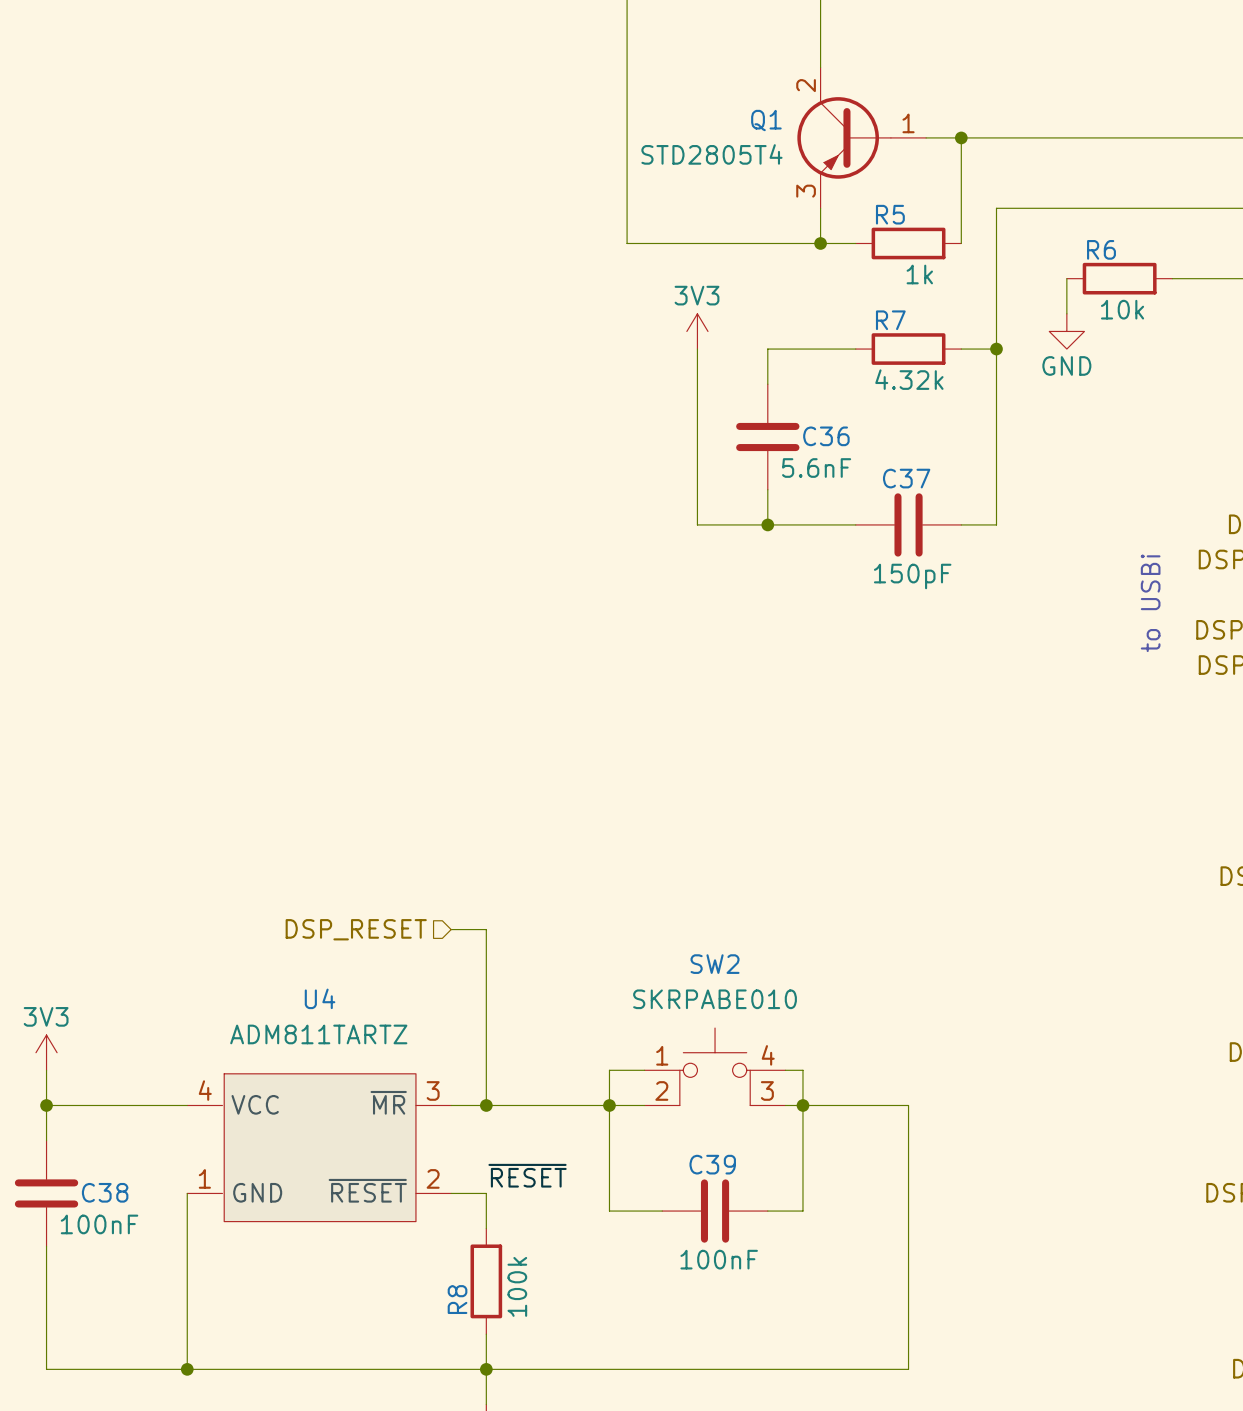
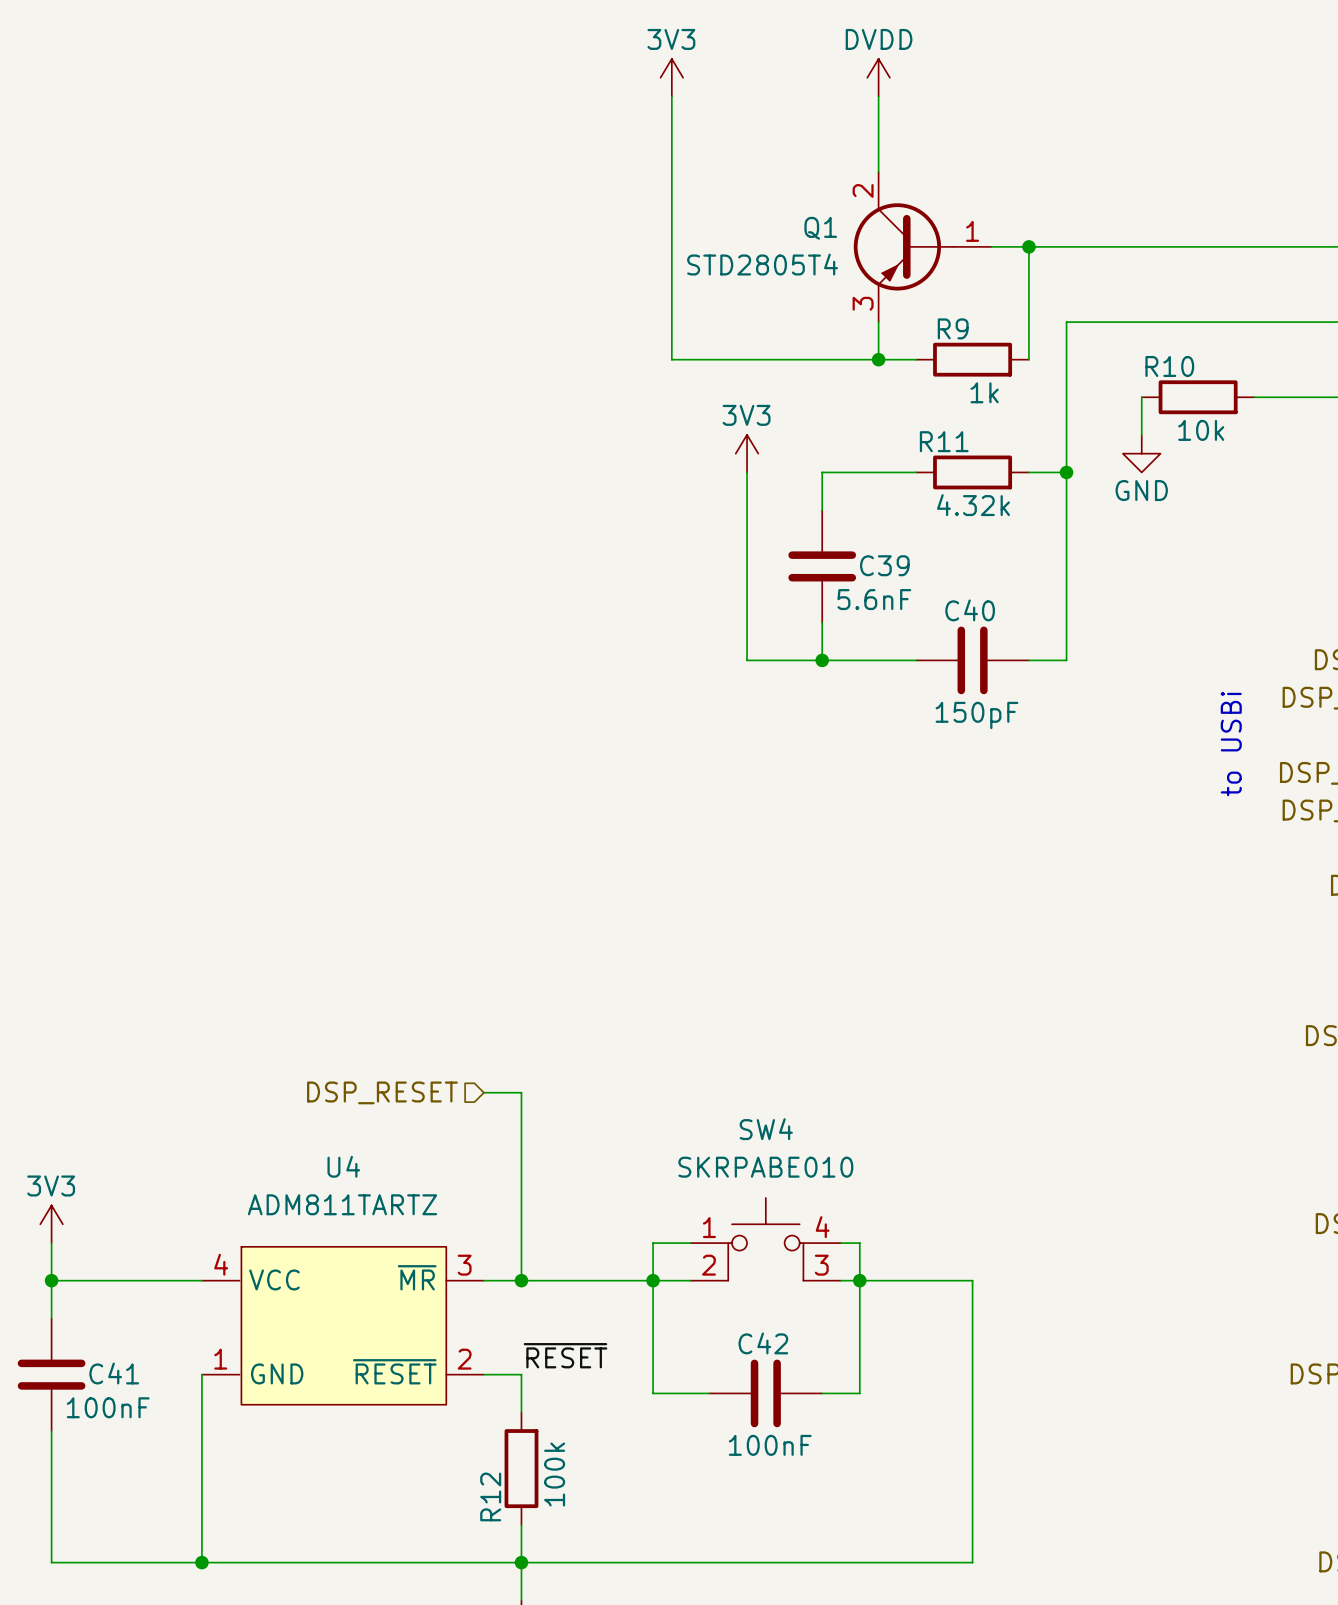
R5 name: R5 (890, 214) -> R9 (953, 328)
R6 name: R6 (1101, 249) -> R10 (1169, 366)
R7 name: R7 (890, 320) -> R11 (944, 441)
C36 name: C36 (826, 436) -> C39 (884, 565)
C37 name: C37 (906, 478) -> C40 (970, 610)
SW2 name: SW2 (715, 964) -> SW4 (766, 1129)
C39 name: C39 (712, 1164) -> C42 (763, 1343)
C38 name: C38 (105, 1192) -> C41 (114, 1373)
R8 name: R8 (457, 1299) -> R12 (490, 1496)

